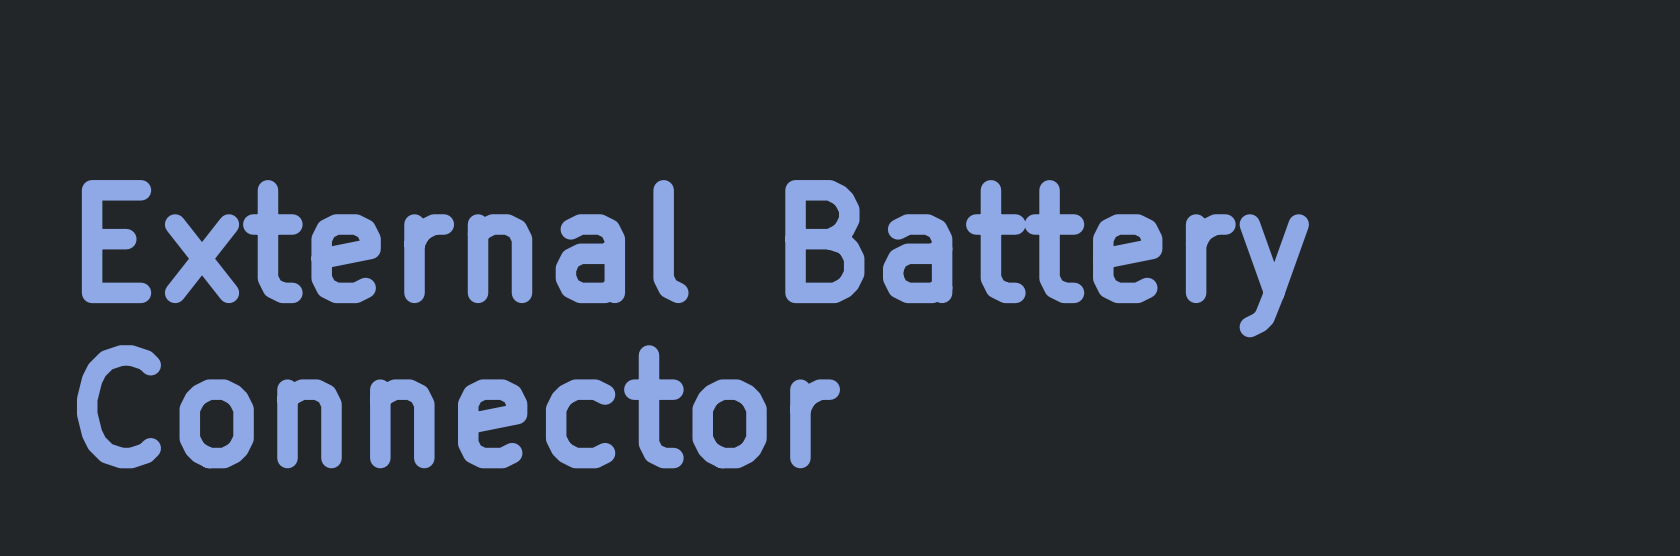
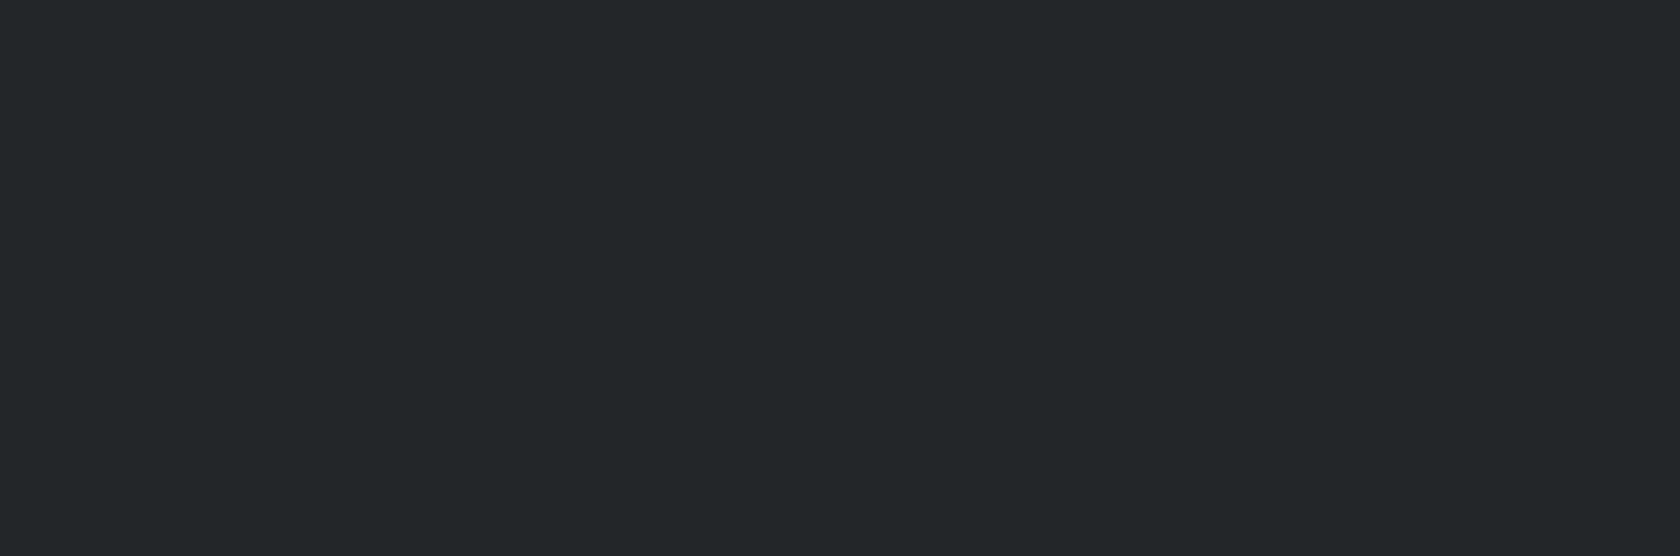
text: External Battery (695, 258) -> none
text: Connector (458, 406) -> none

